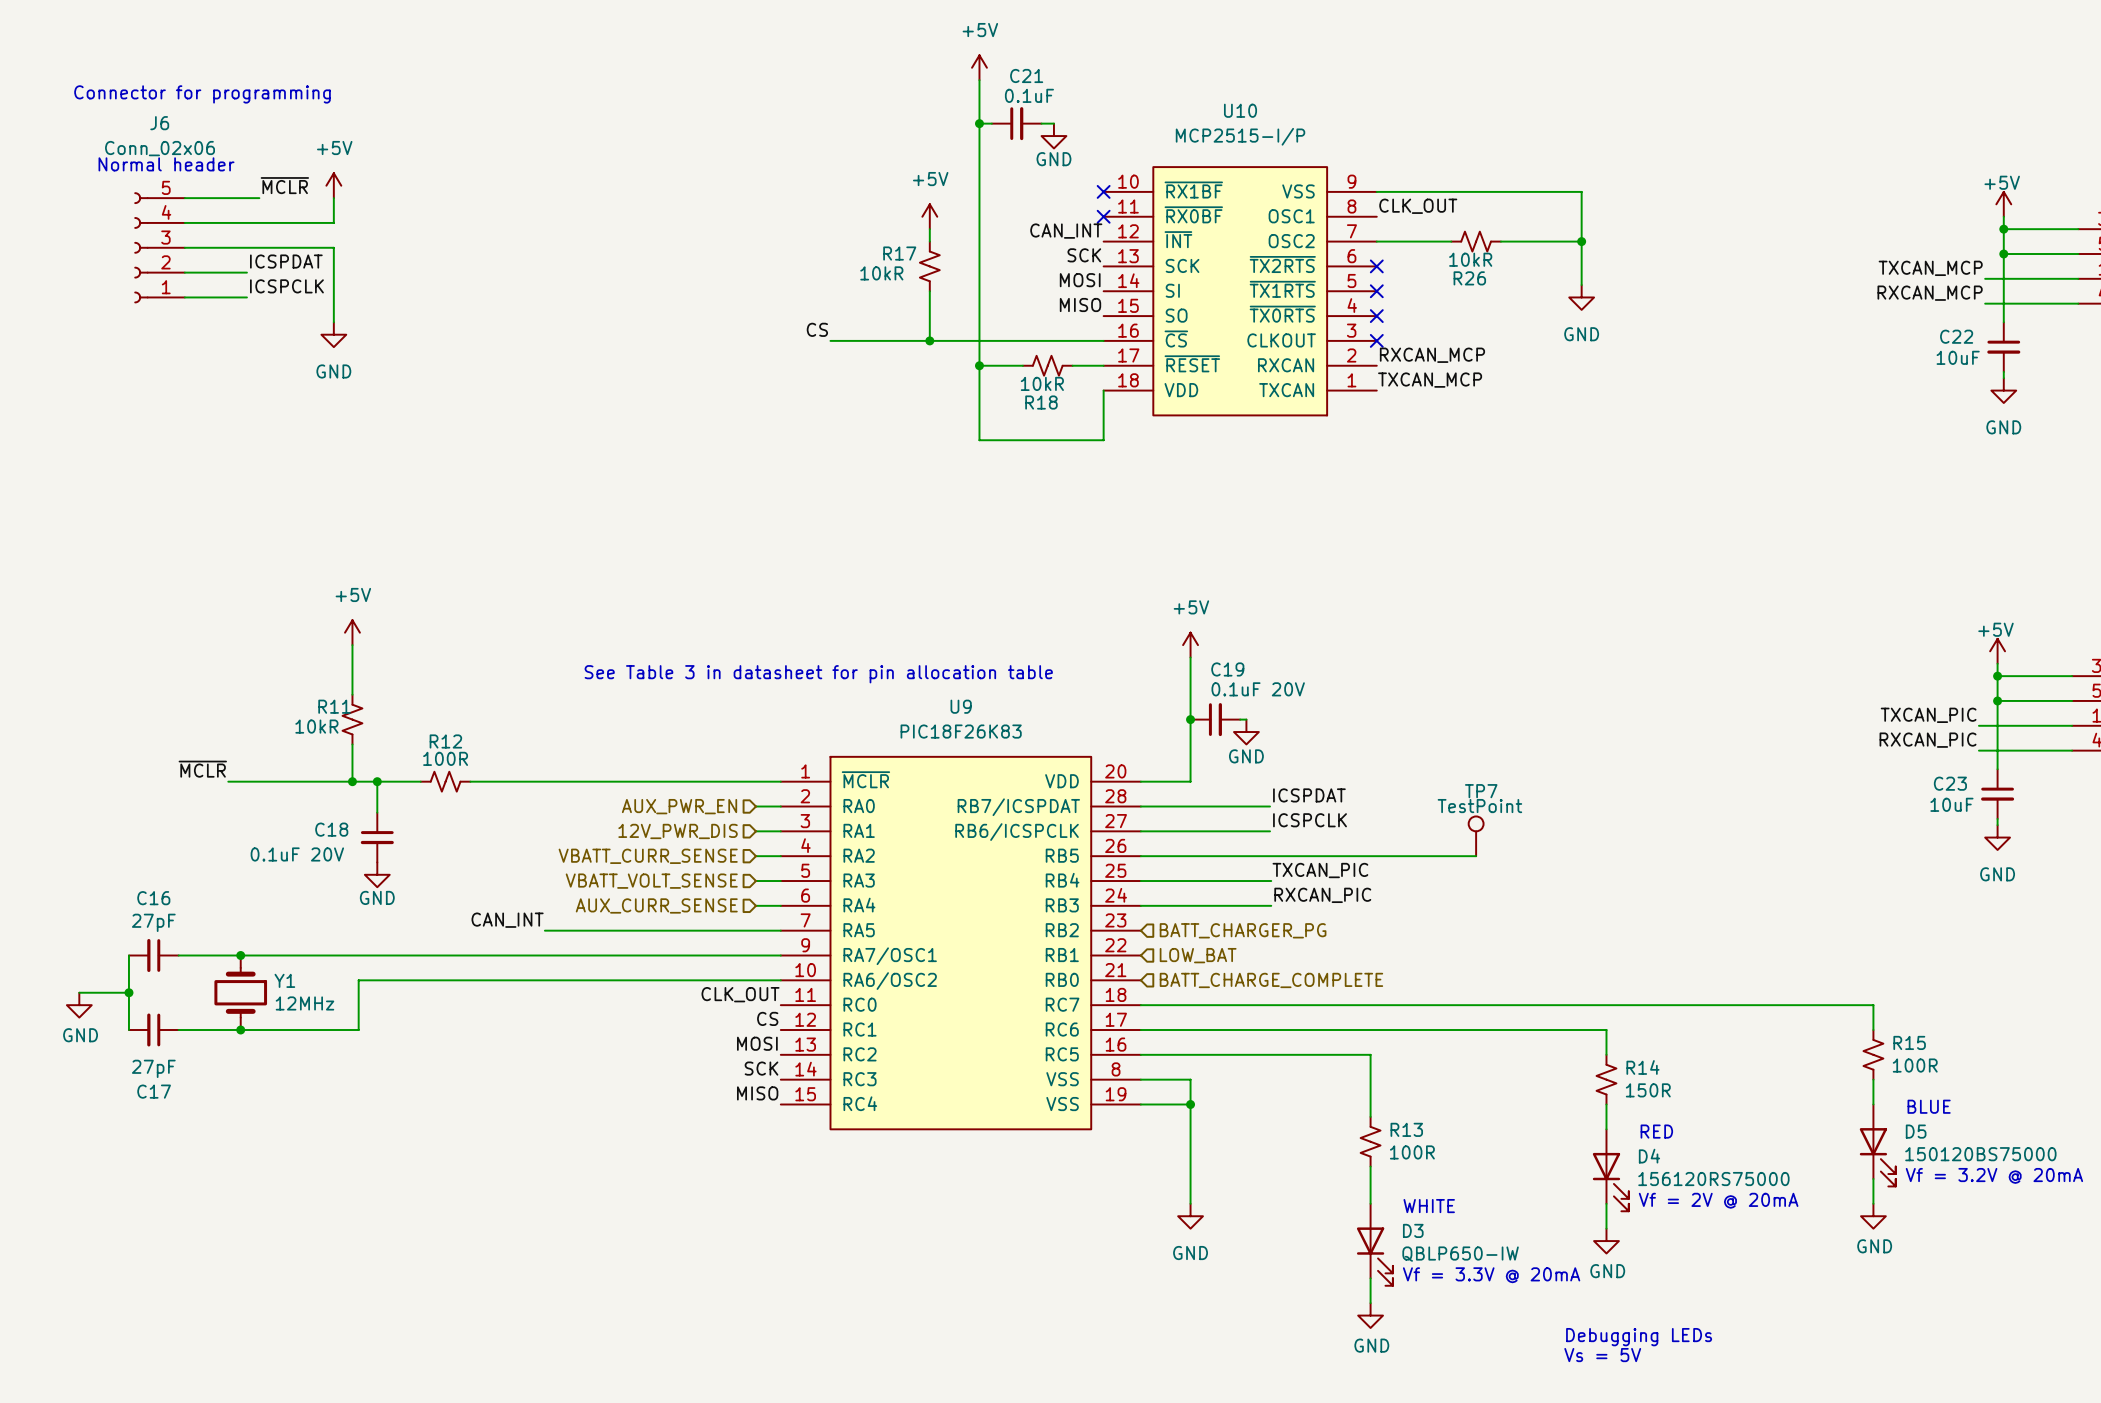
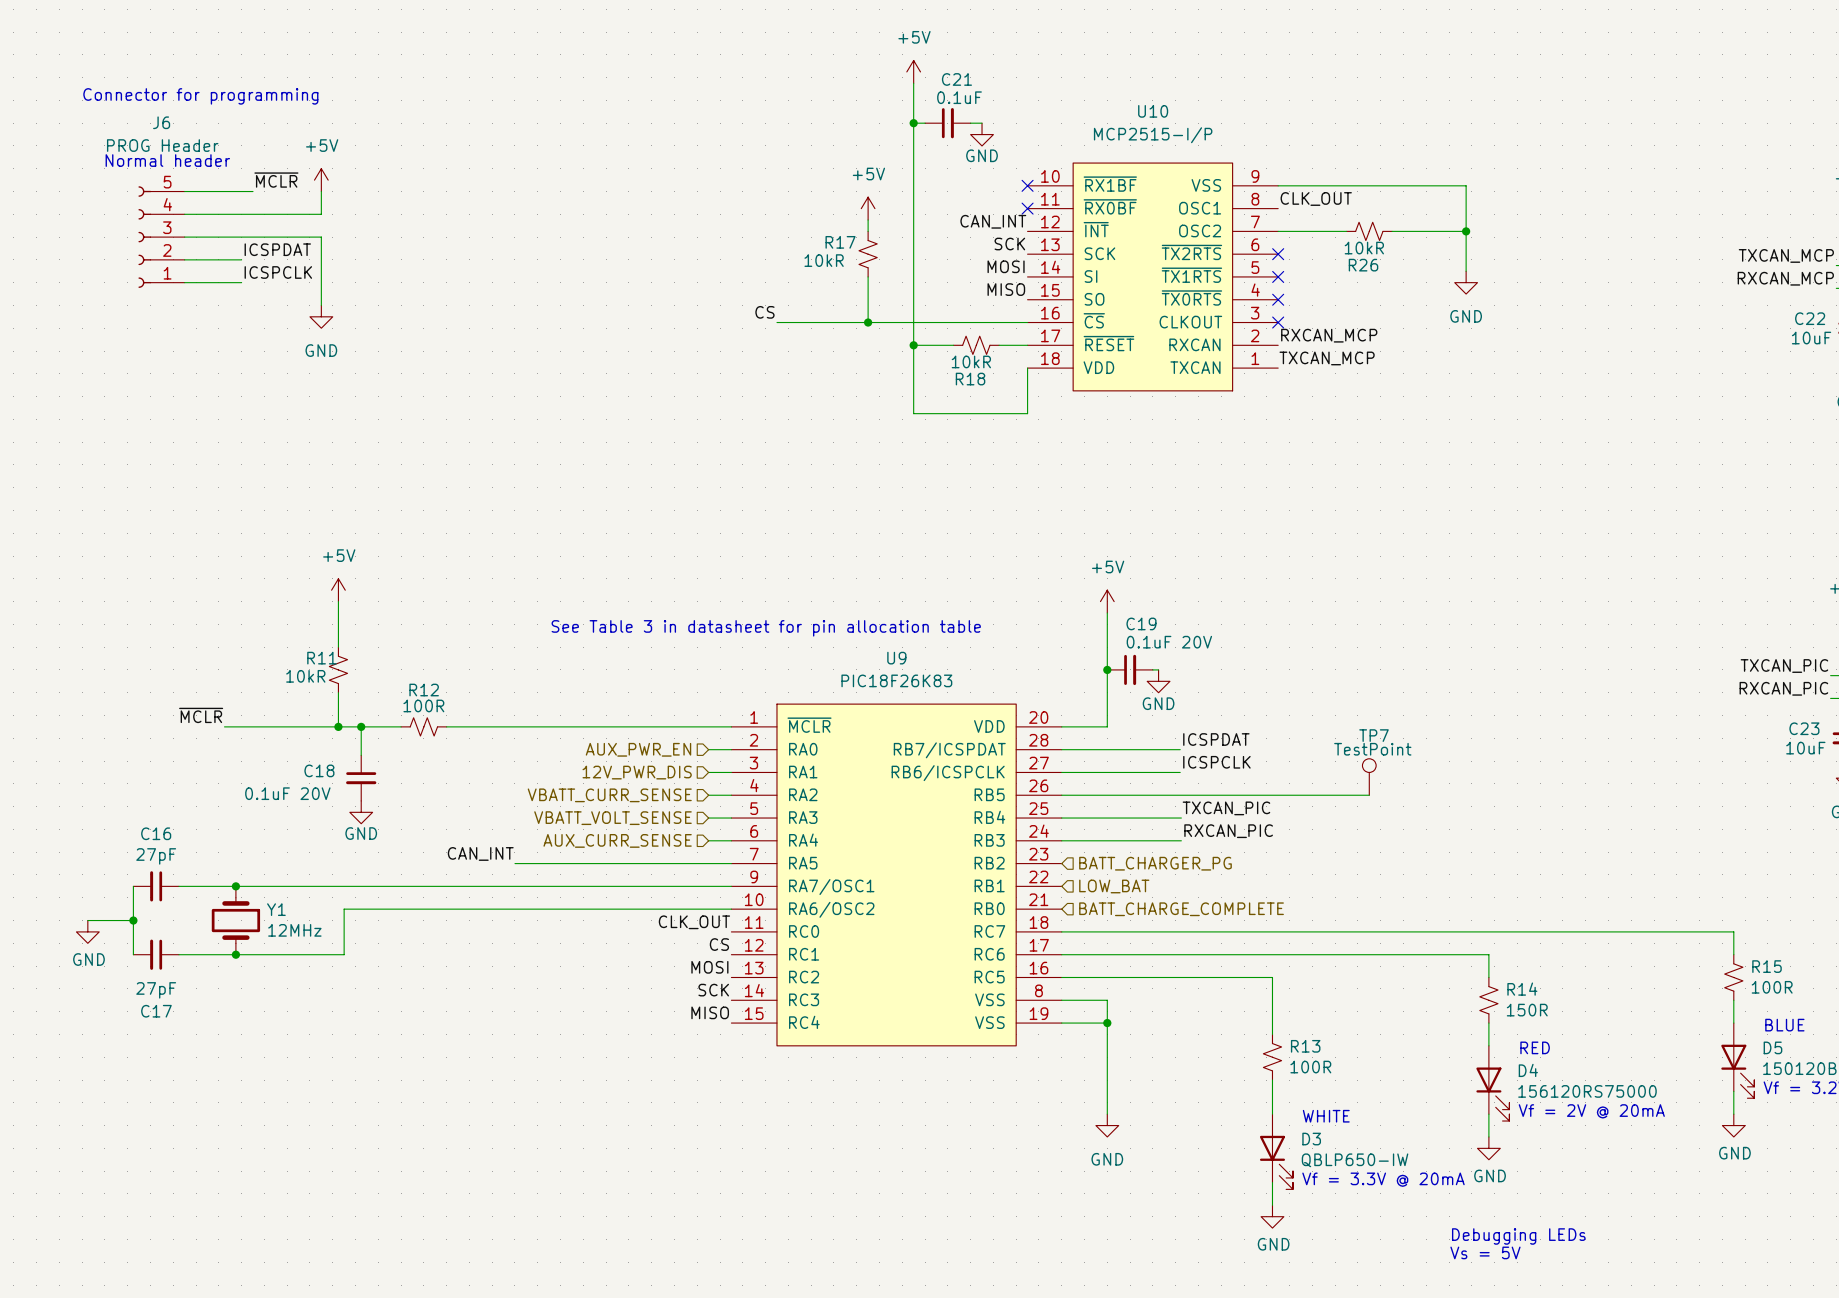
J6 value: Conn_02x06 (160, 148) -> PROG Header (162, 145)

